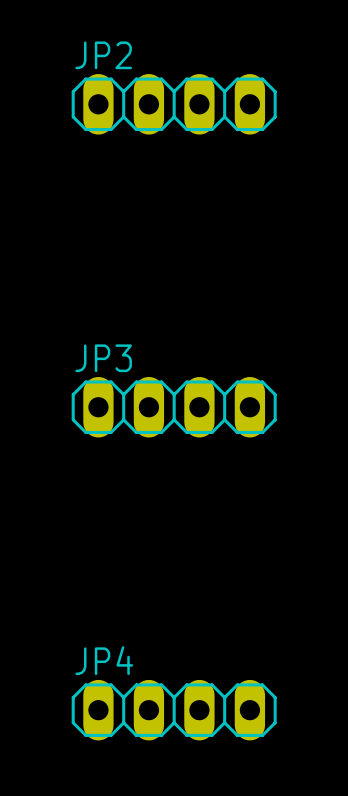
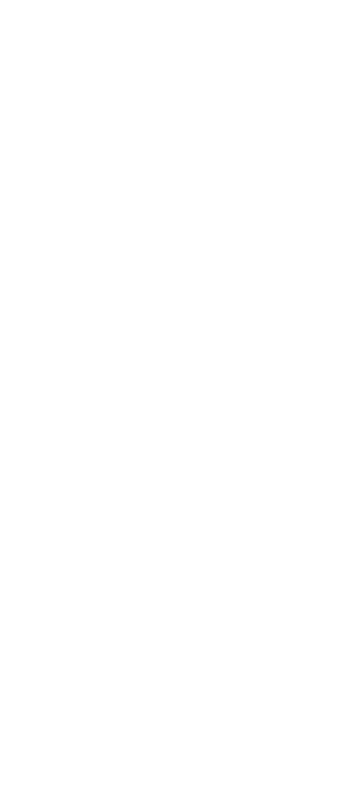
JP2: (174, 104) -> none
JP3: (174, 407) -> none
JP4: (174, 710) -> none

